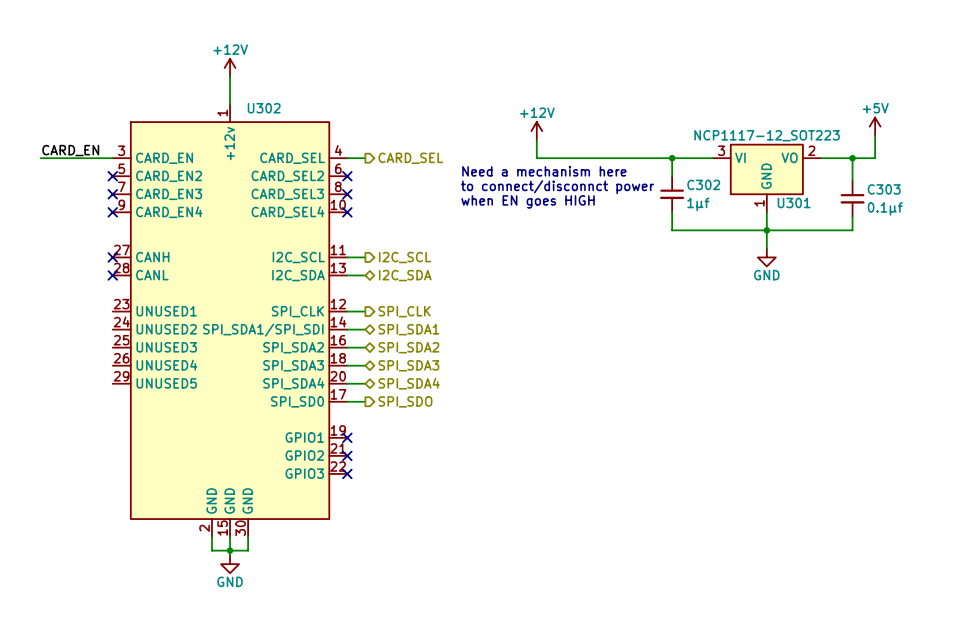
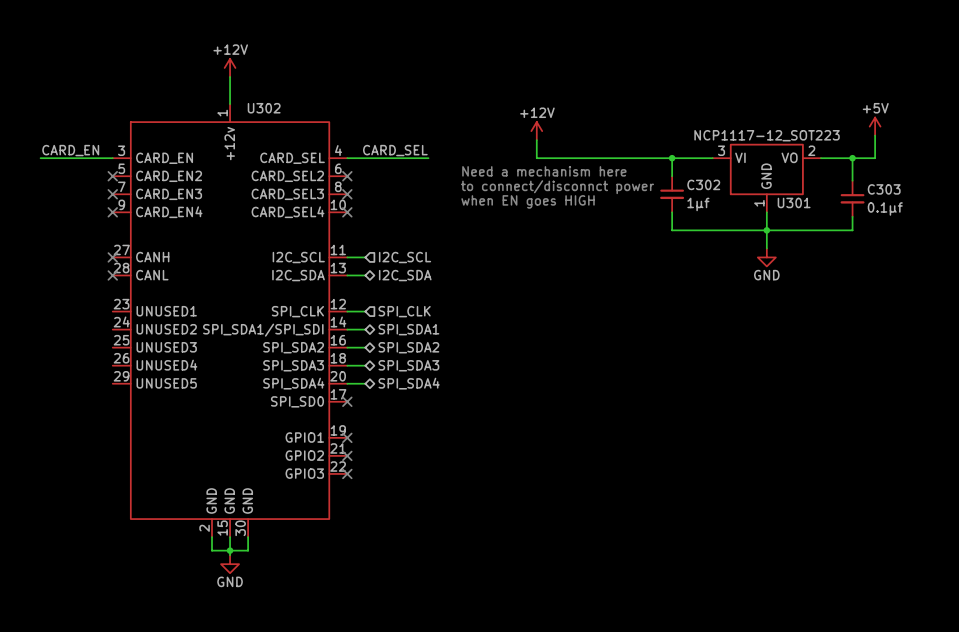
label: none -> CARD_SEL (395, 150)
wire: none -> (365, 158) (428, 158)
hierarchical label: CARD_SEL (410, 158) -> none
hierarchical label shape: output (405, 257) -> input (405, 257)
hierarchical label shape: output (404, 311) -> input (404, 311)
wire: (347, 401) (365, 401) -> none
no-connect mark: none -> (347, 401)
hierarchical label: SPI_SDO (405, 401) -> none

